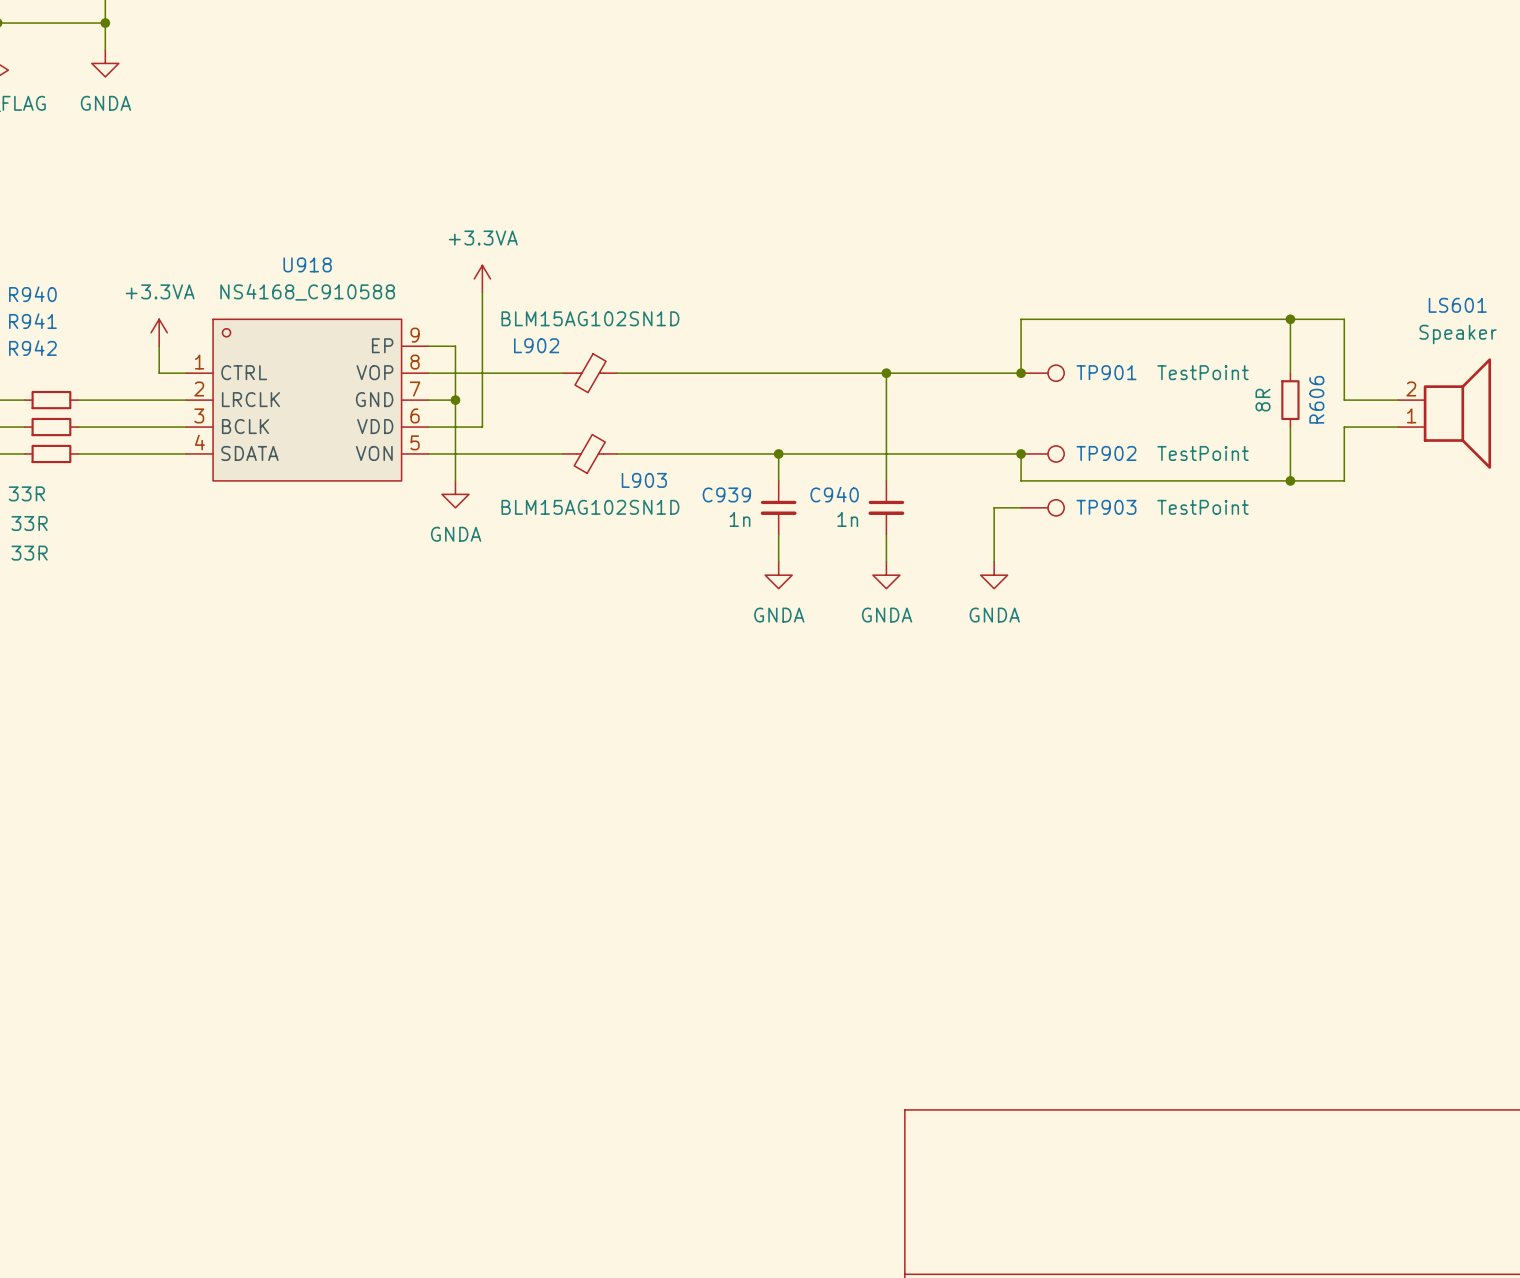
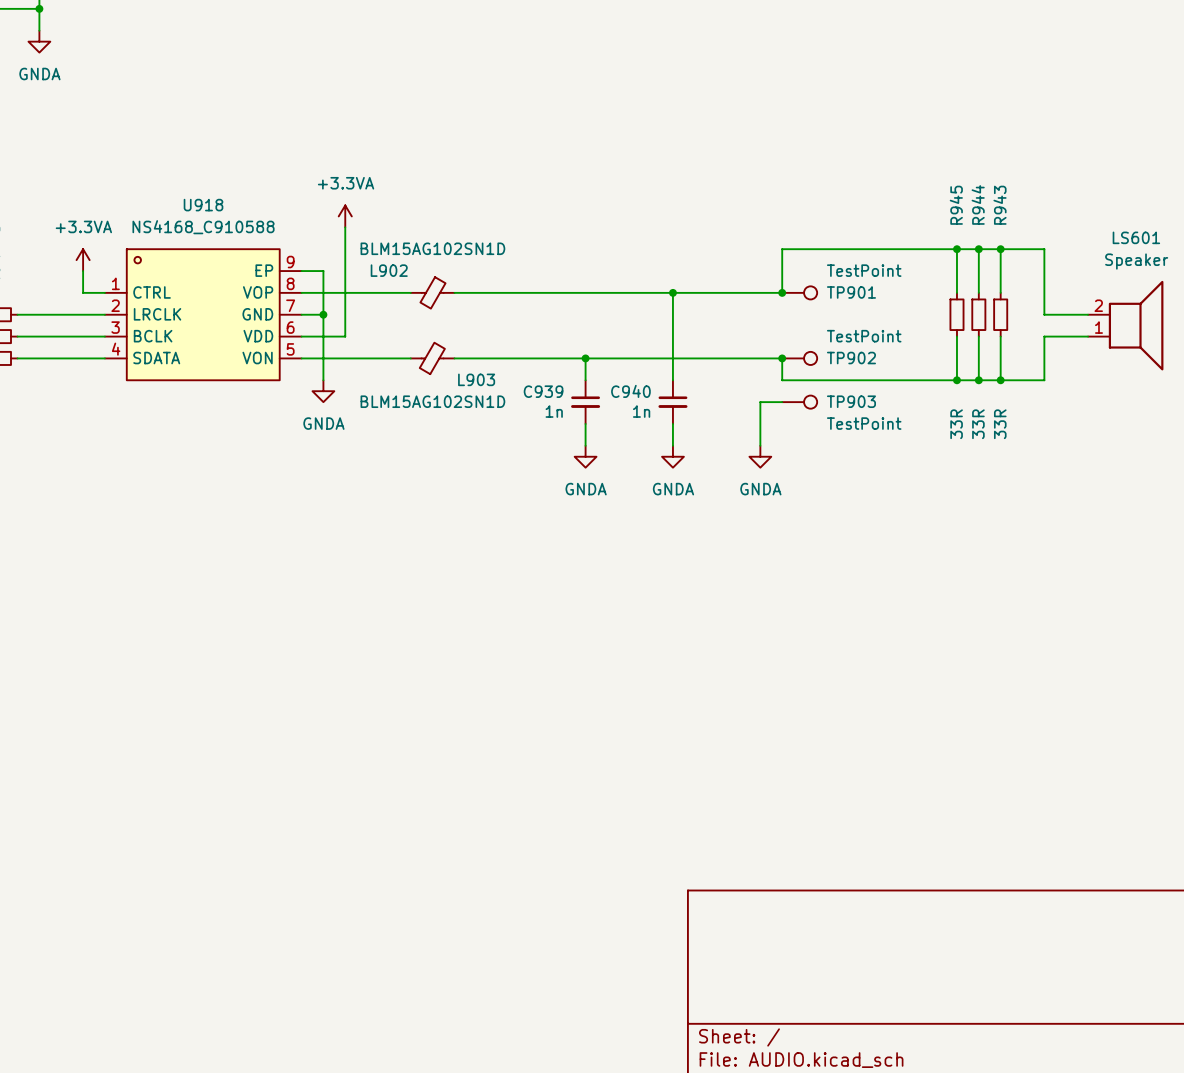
wire: none -> (956, 249) (956, 292)
junction: none -> (956, 249)
wire: none -> (978, 249) (978, 292)
junction: none -> (978, 249)
TP901 value position: TestPoint (1202, 372) -> TestPoint (864, 270)
R606 name: R606 (1316, 399) -> R943 (1000, 205)
R945: none -> 33R (956, 314)
R606 value: 8R (1262, 400) -> 33R (1000, 424)
R944: none -> 33R (978, 314)
wire: none -> (956, 336) (956, 380)
wire: none -> (978, 336) (978, 380)
TP902 value position: TestPoint (1202, 453) -> TestPoint (864, 336)
junction: none -> (956, 380)
junction: none -> (978, 380)
TP903 value position: TestPoint (1202, 507) -> TestPoint (864, 423)

